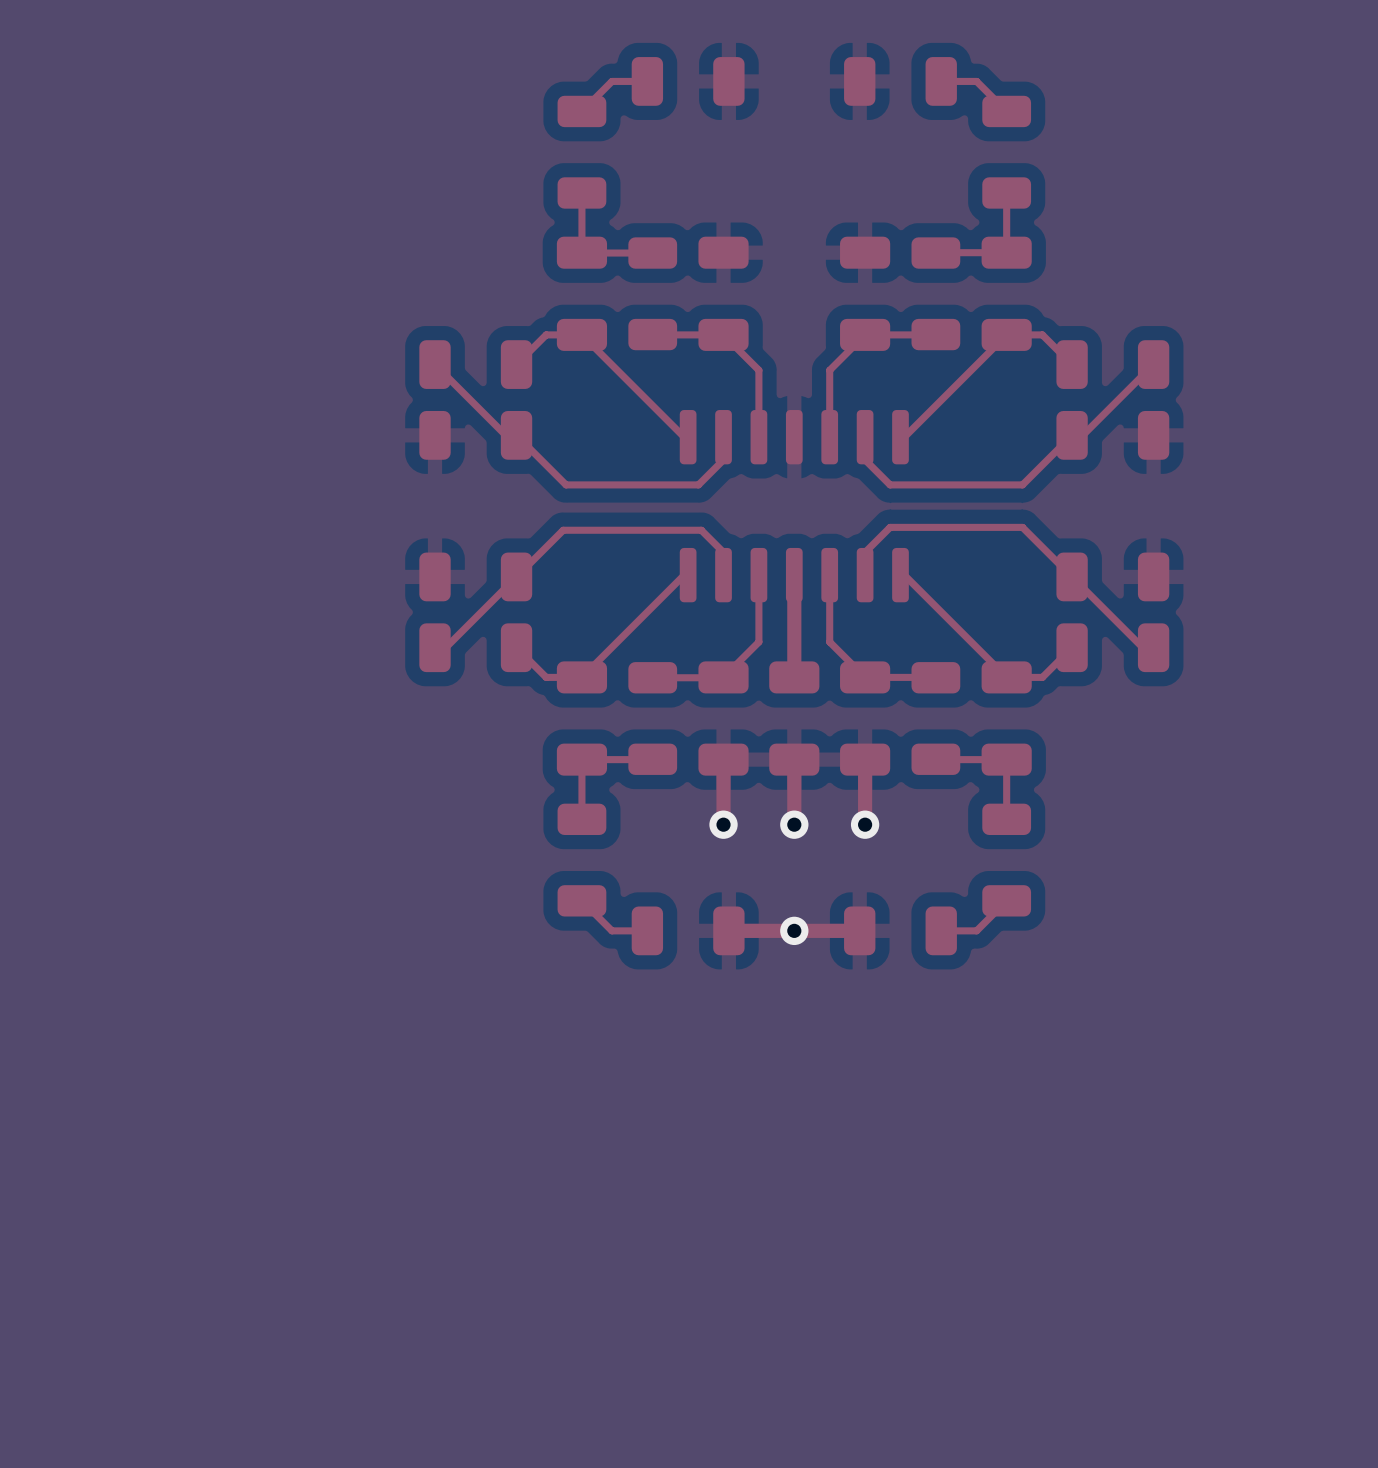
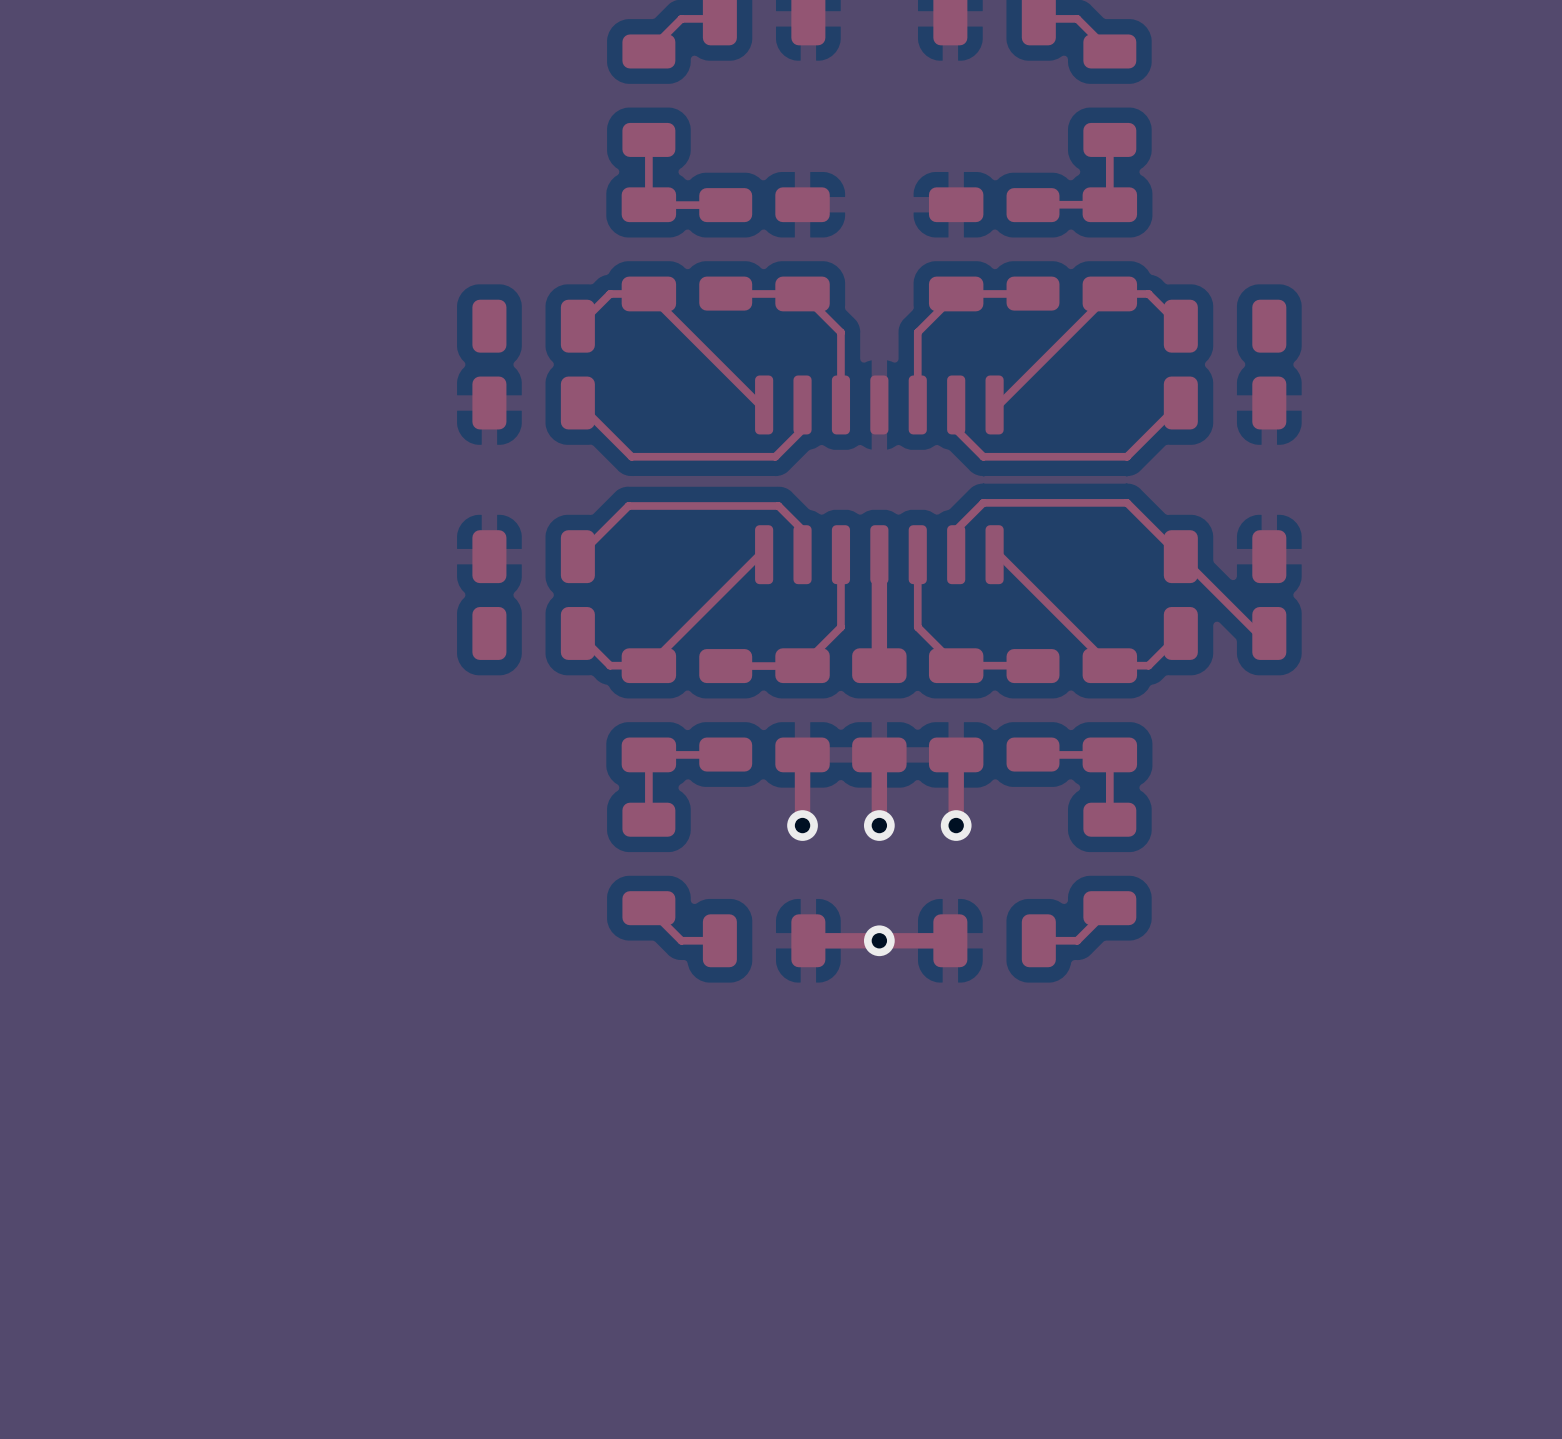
top track: (435, 364) (505, 435) -> none
top track: (1153, 364) (1082, 435) -> none
top track: (516, 576) (445, 647) -> none

